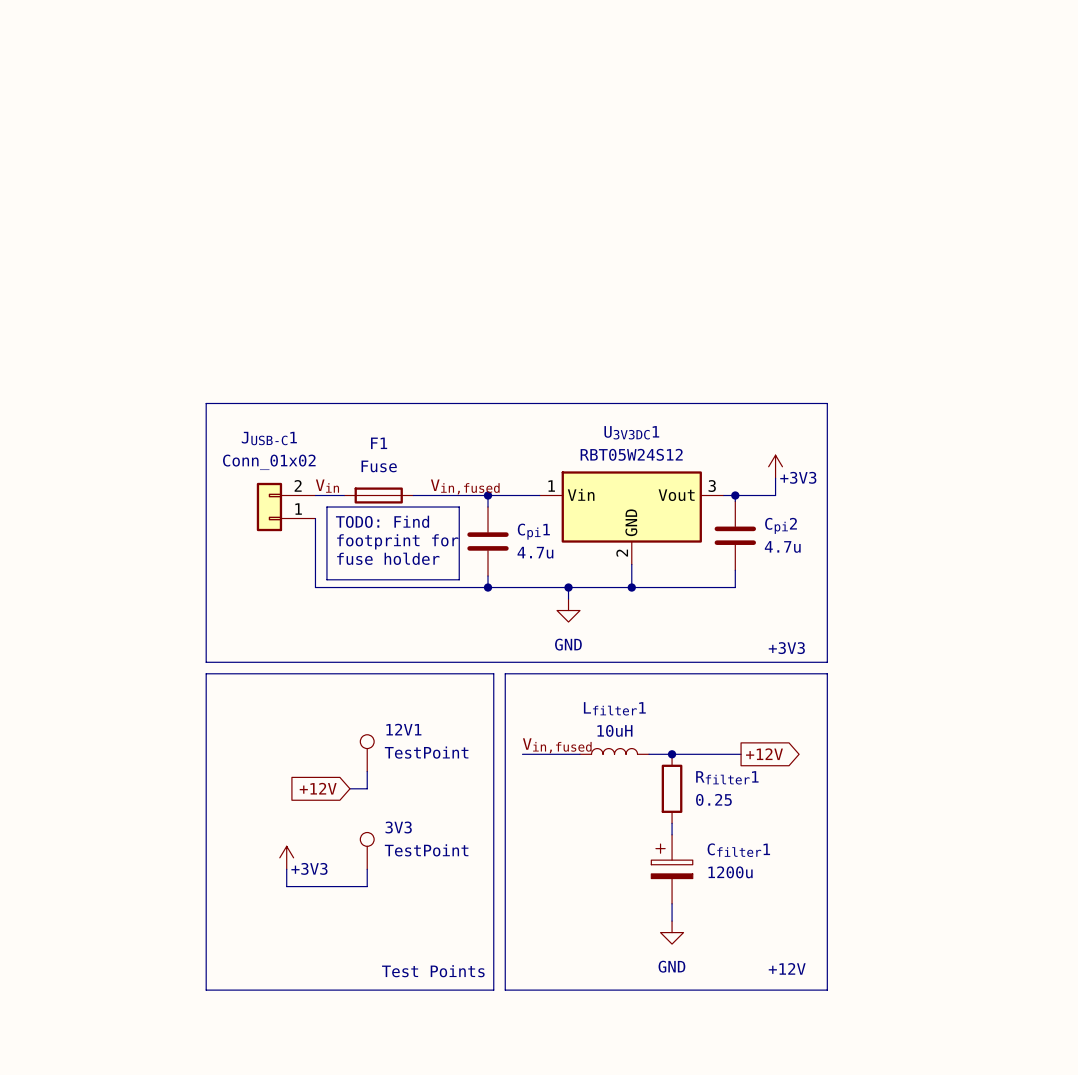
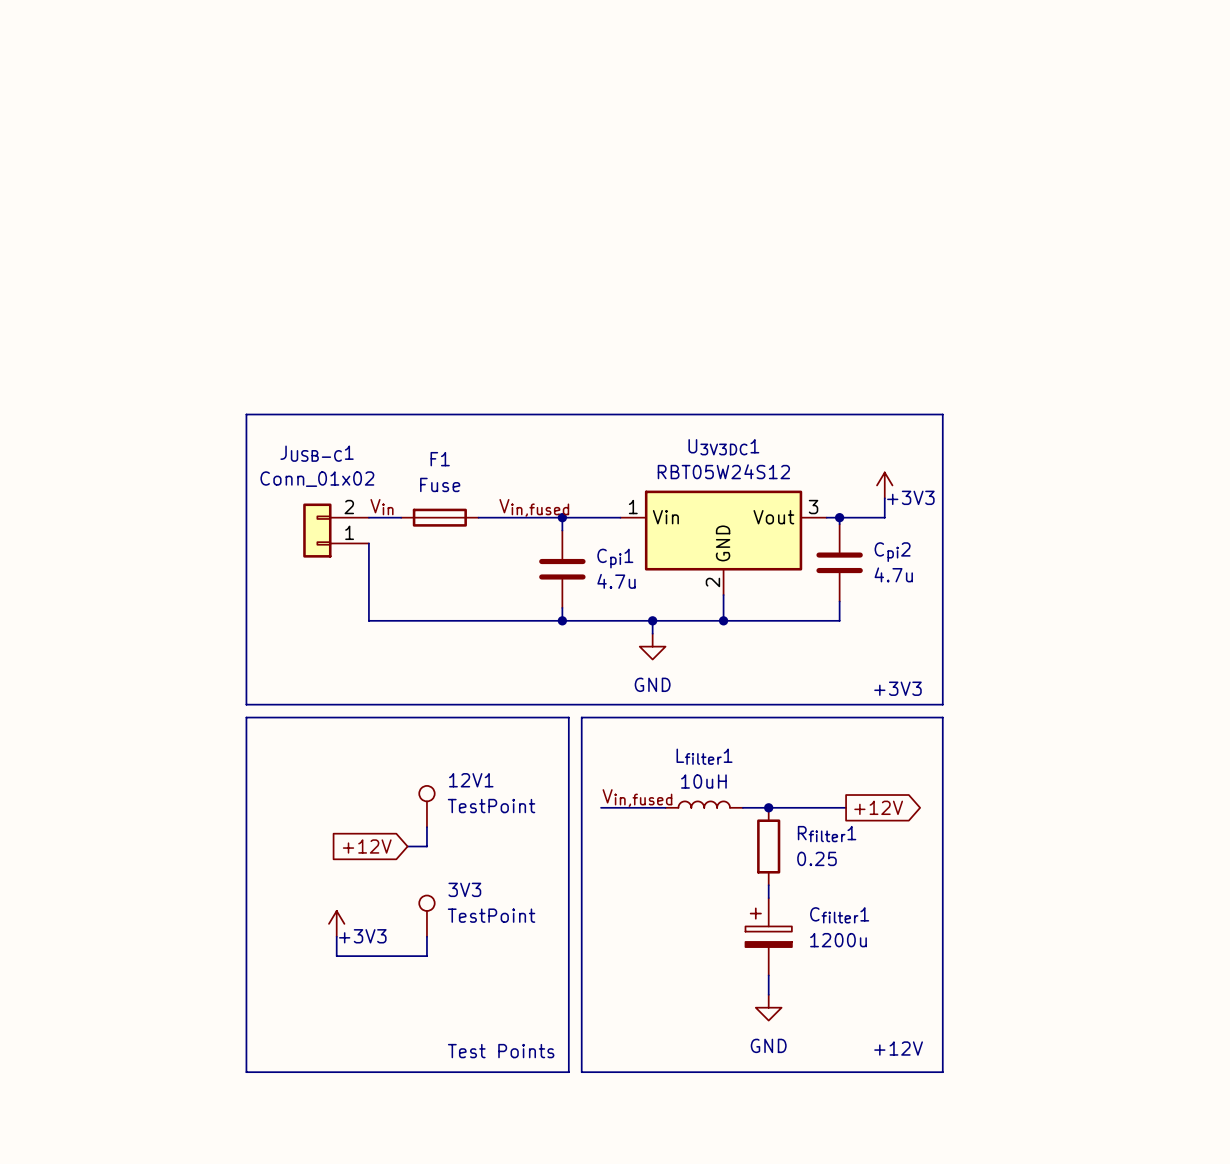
line: (326, 507) (459, 507) (459, 579) (326, 579) (326, 507) -> none
text: TODO: Find (382, 521) -> none
text: footprint for (397, 541) -> none
text: fuse holder (388, 558) -> none

